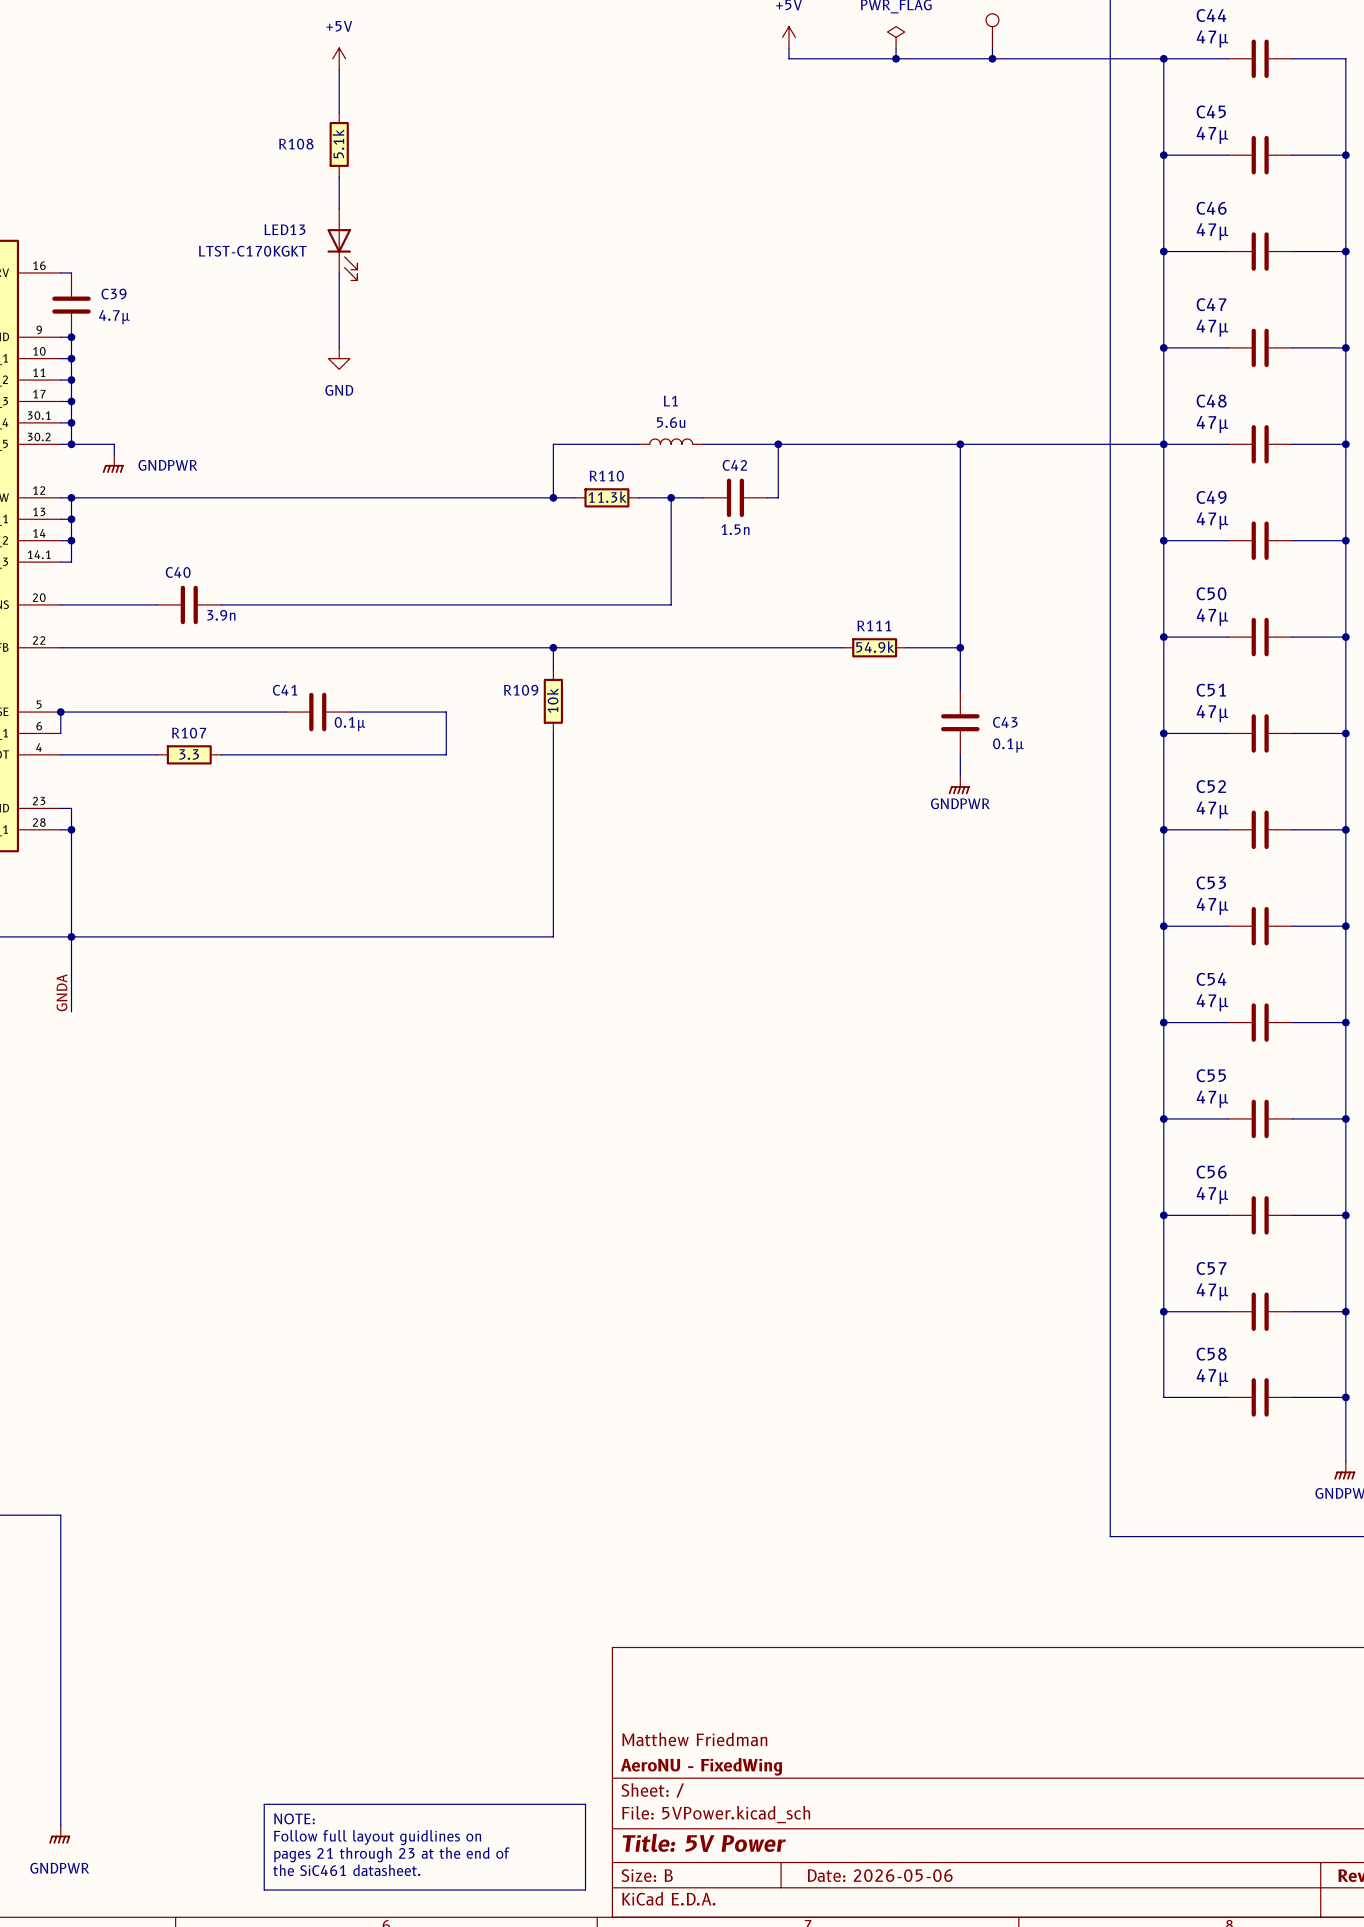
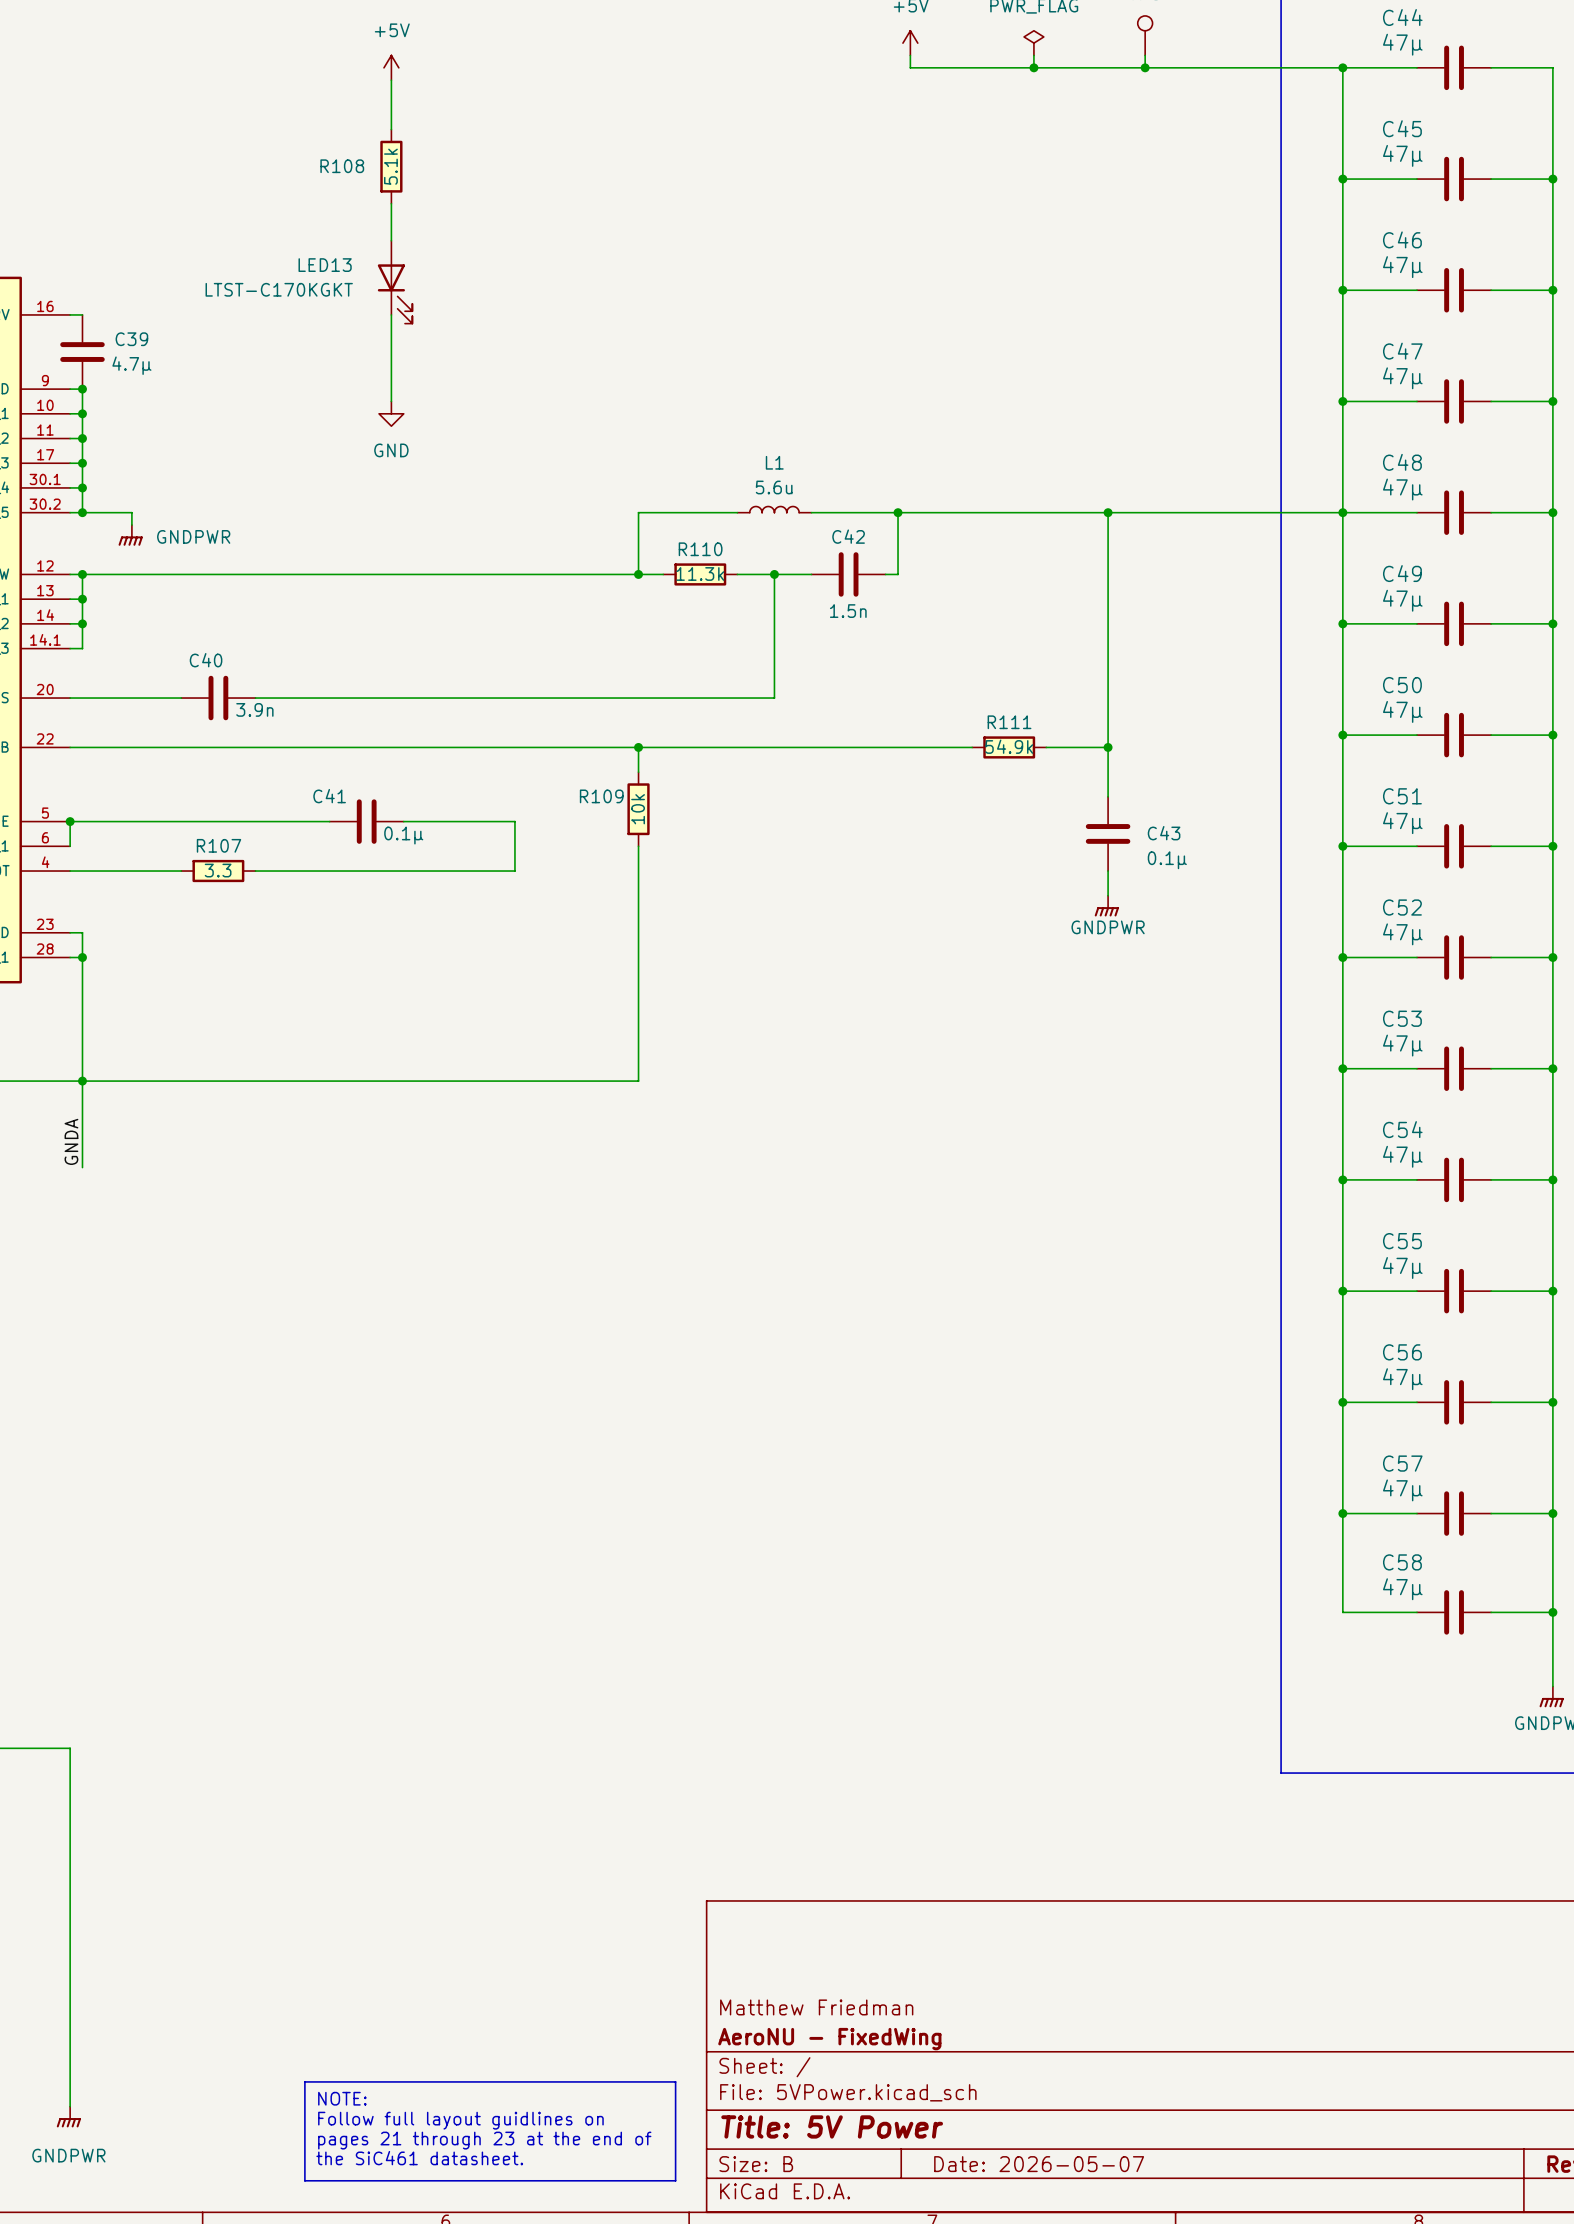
title block: Date: 2026-05-06 (880, 1875) -> Date: 2026-05-07 (1039, 2164)

